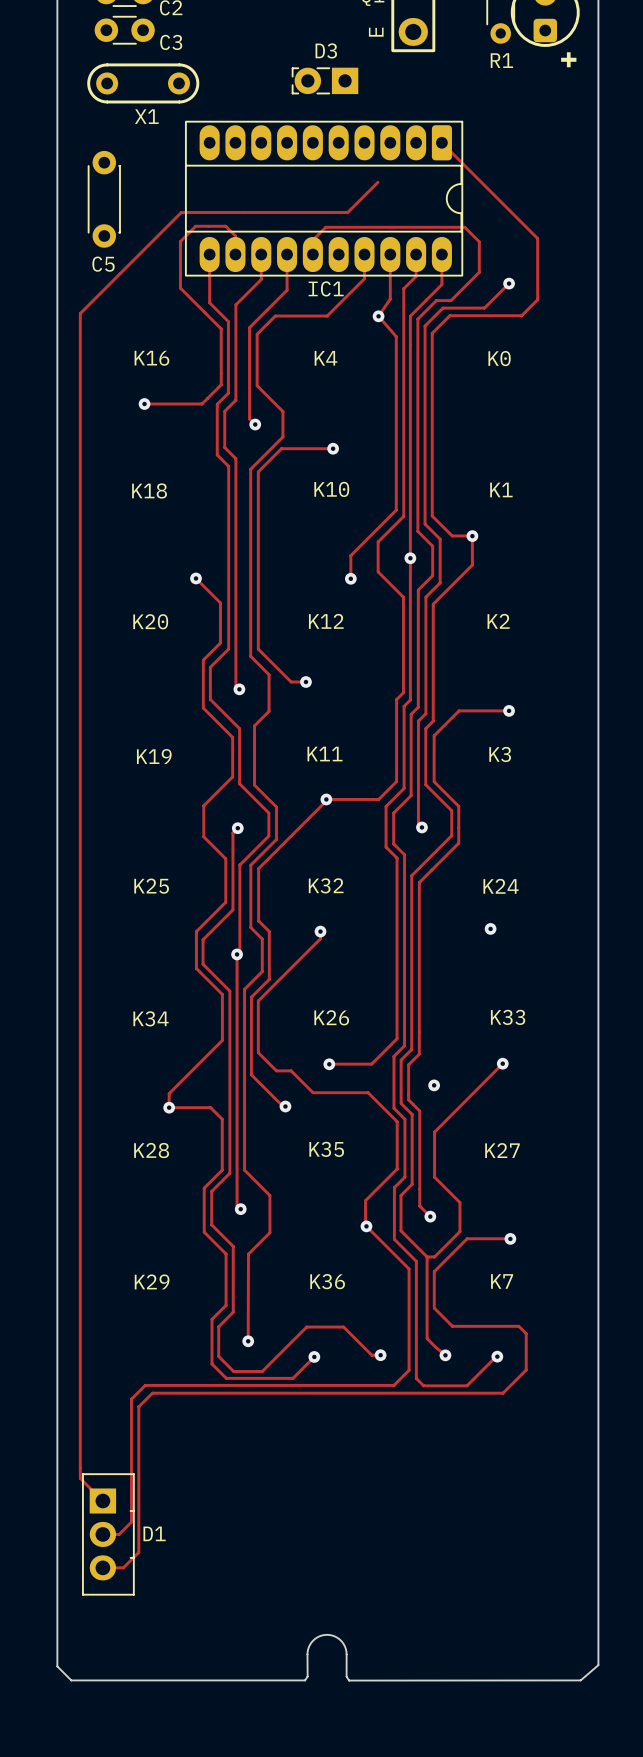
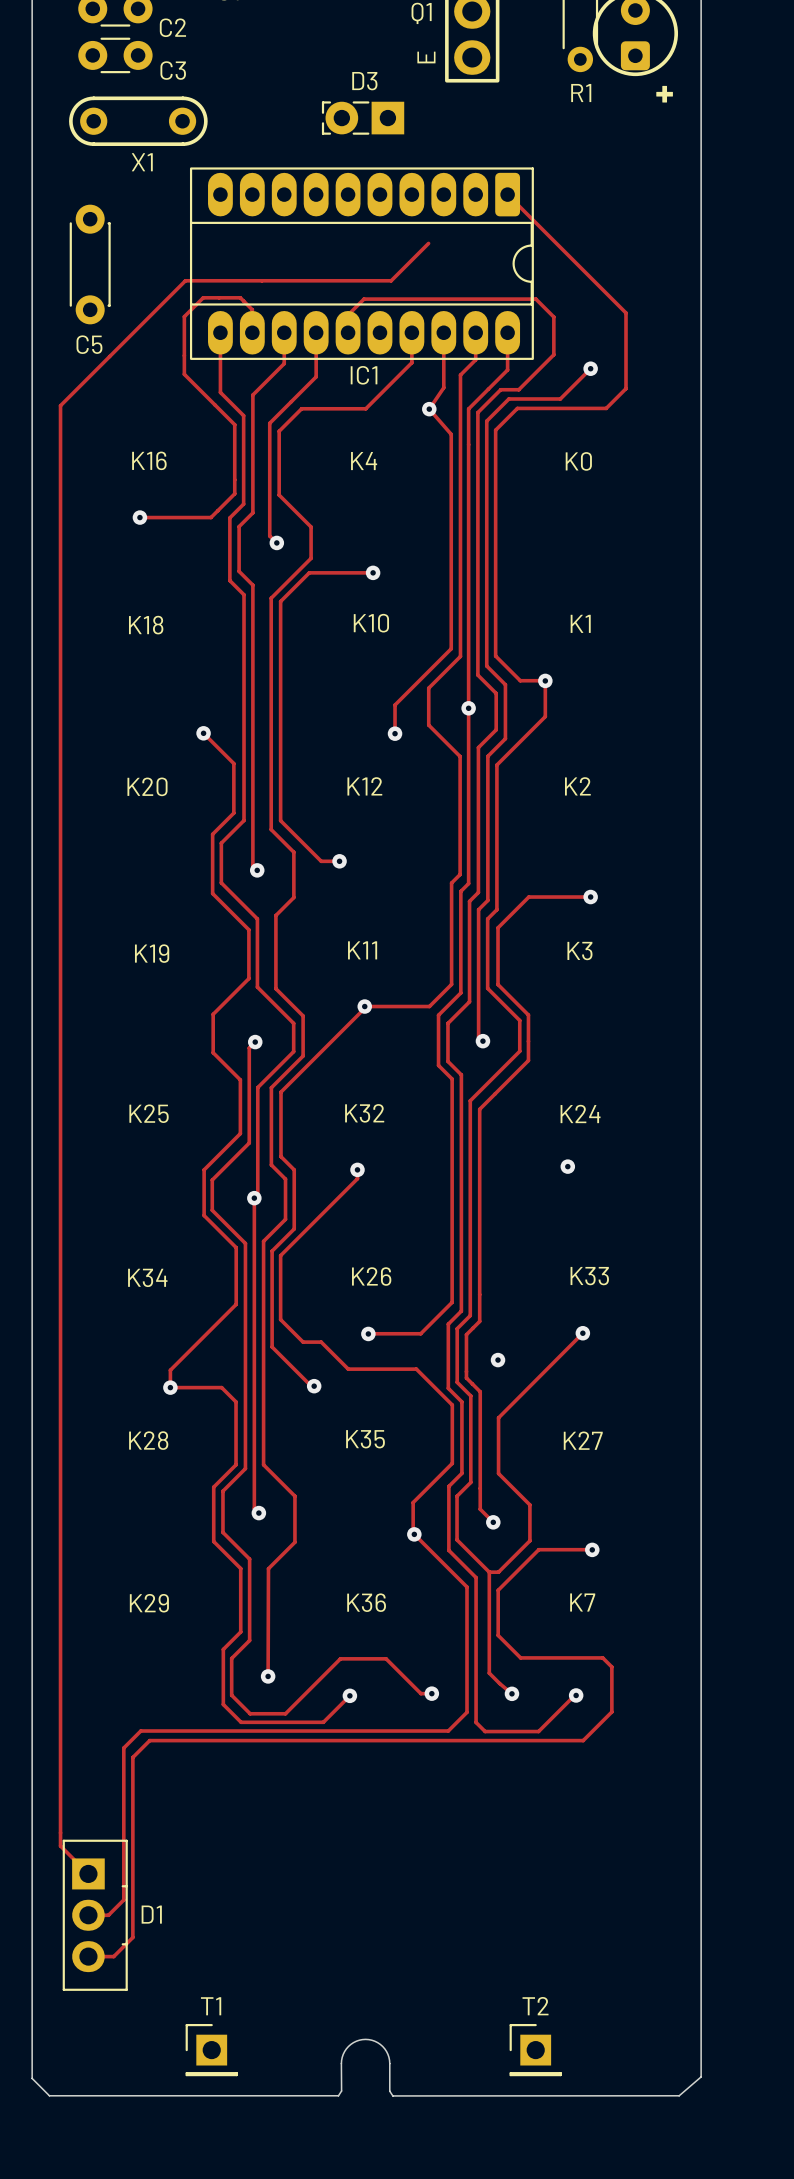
T1: none -> (211, 2050)
T2: none -> (535, 2050)

